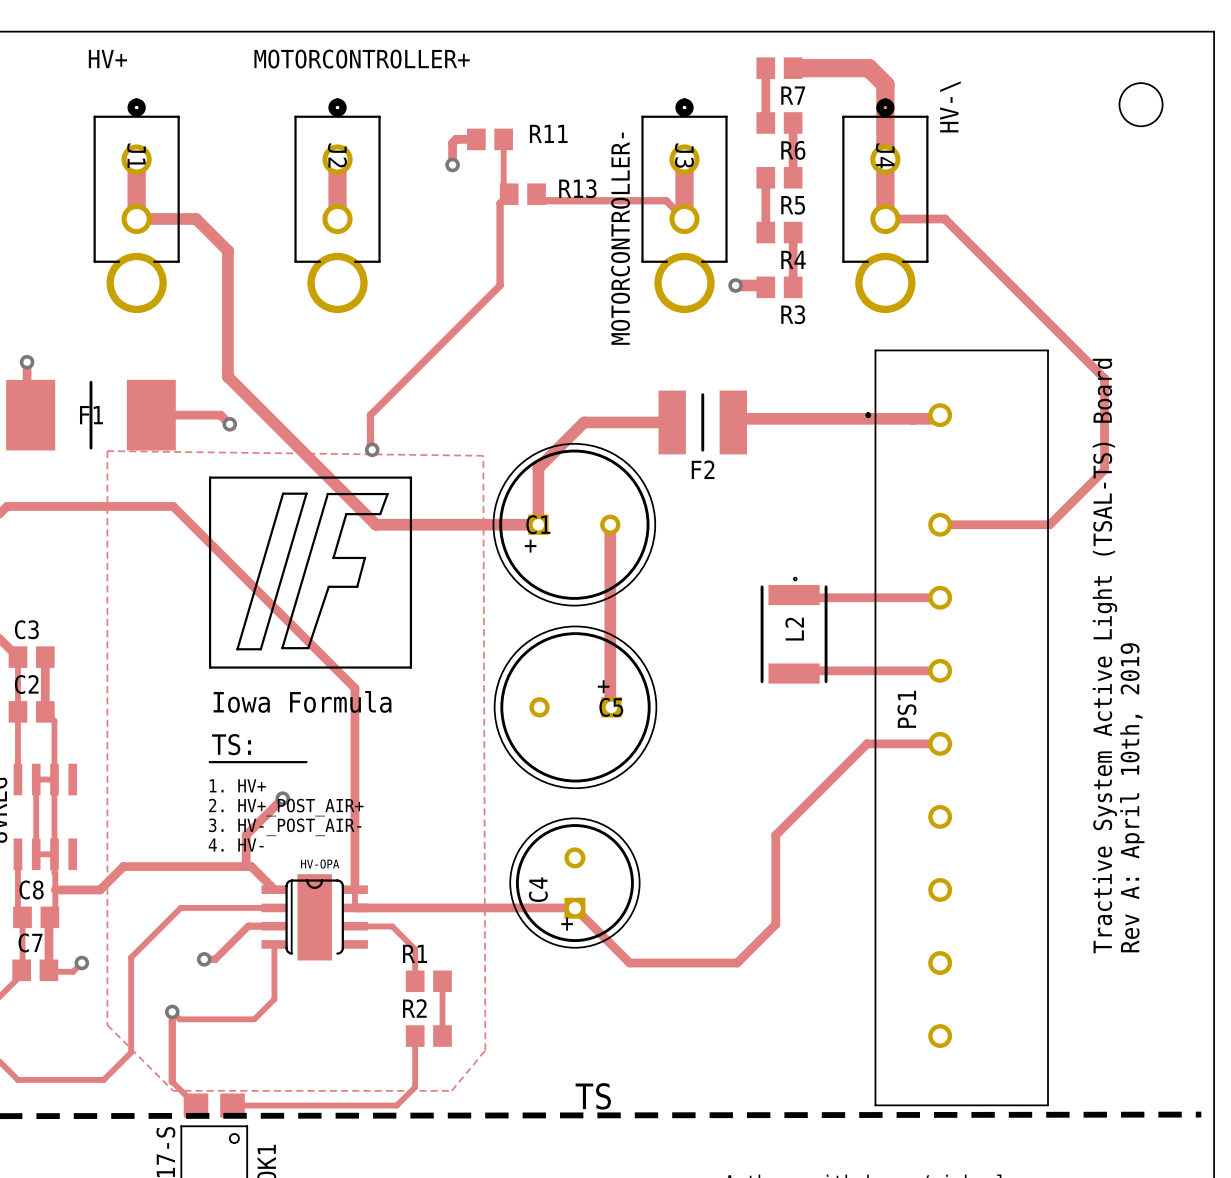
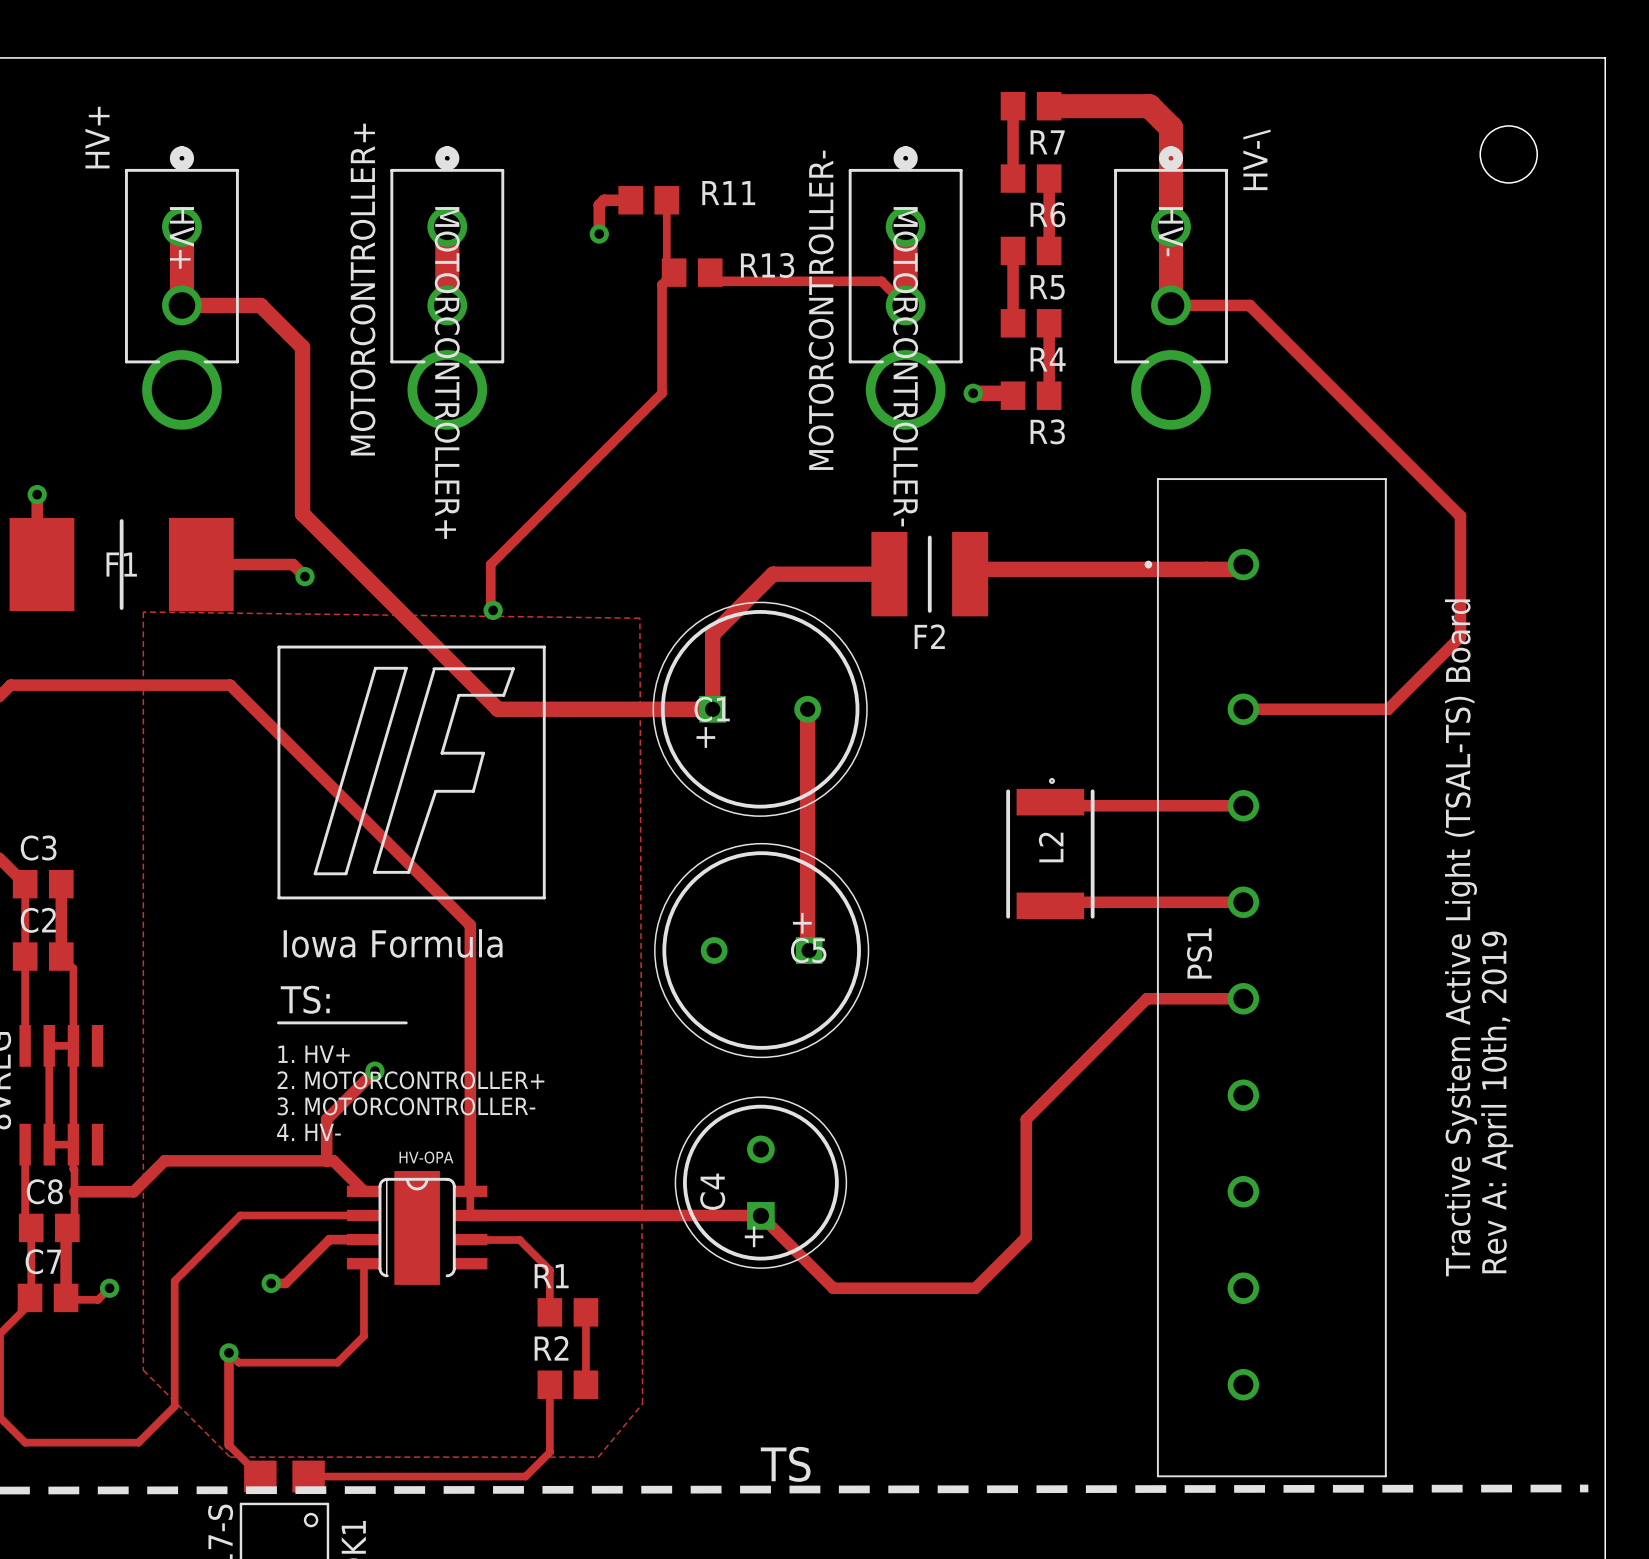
text rotation: 0° (107, 59) -> 90° counterclockwise (97, 137)
text rotation: 0° (362, 59) -> 90° counterclockwise (362, 289)
J1 name: J1 (136, 155) -> HV+ (181, 237)
J2 name: J2 (337, 155) -> MOTORCONTROLLER+ (447, 372)
J3 name: J3 (684, 155) -> MOTORCONTROLLER- (905, 366)
J4 name: J4 (885, 155) -> HV- (1171, 231)
text: 2. HV+_POST_AIR+ (286, 807) -> 2. MOTORCONTROLLER+ (410, 1080)
text: 3. HV-_POST_AIR- (285, 827) -> 3. MOTORCONTROLLER- (406, 1106)

